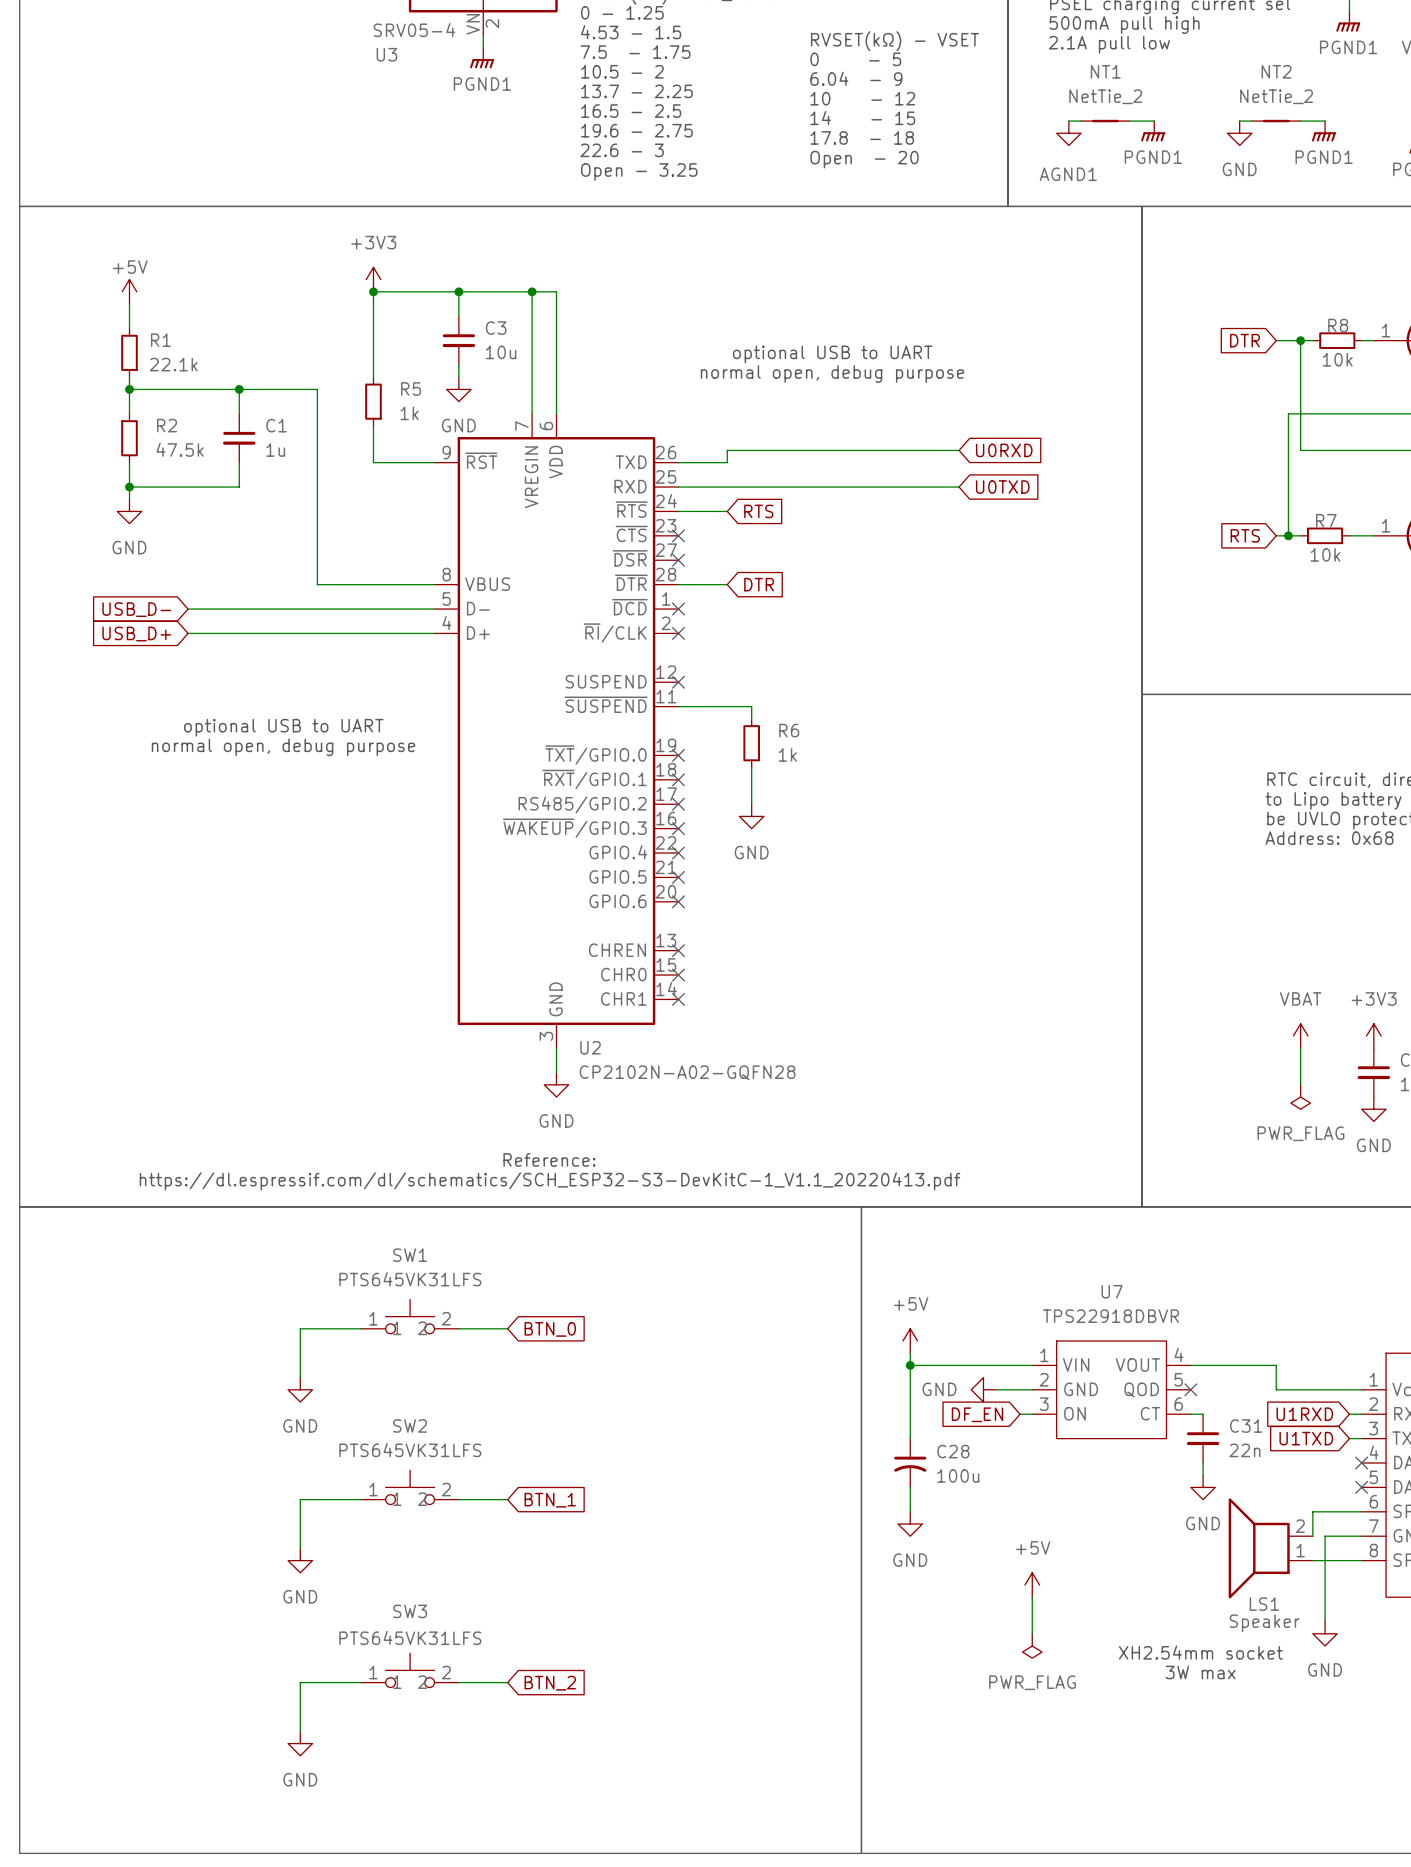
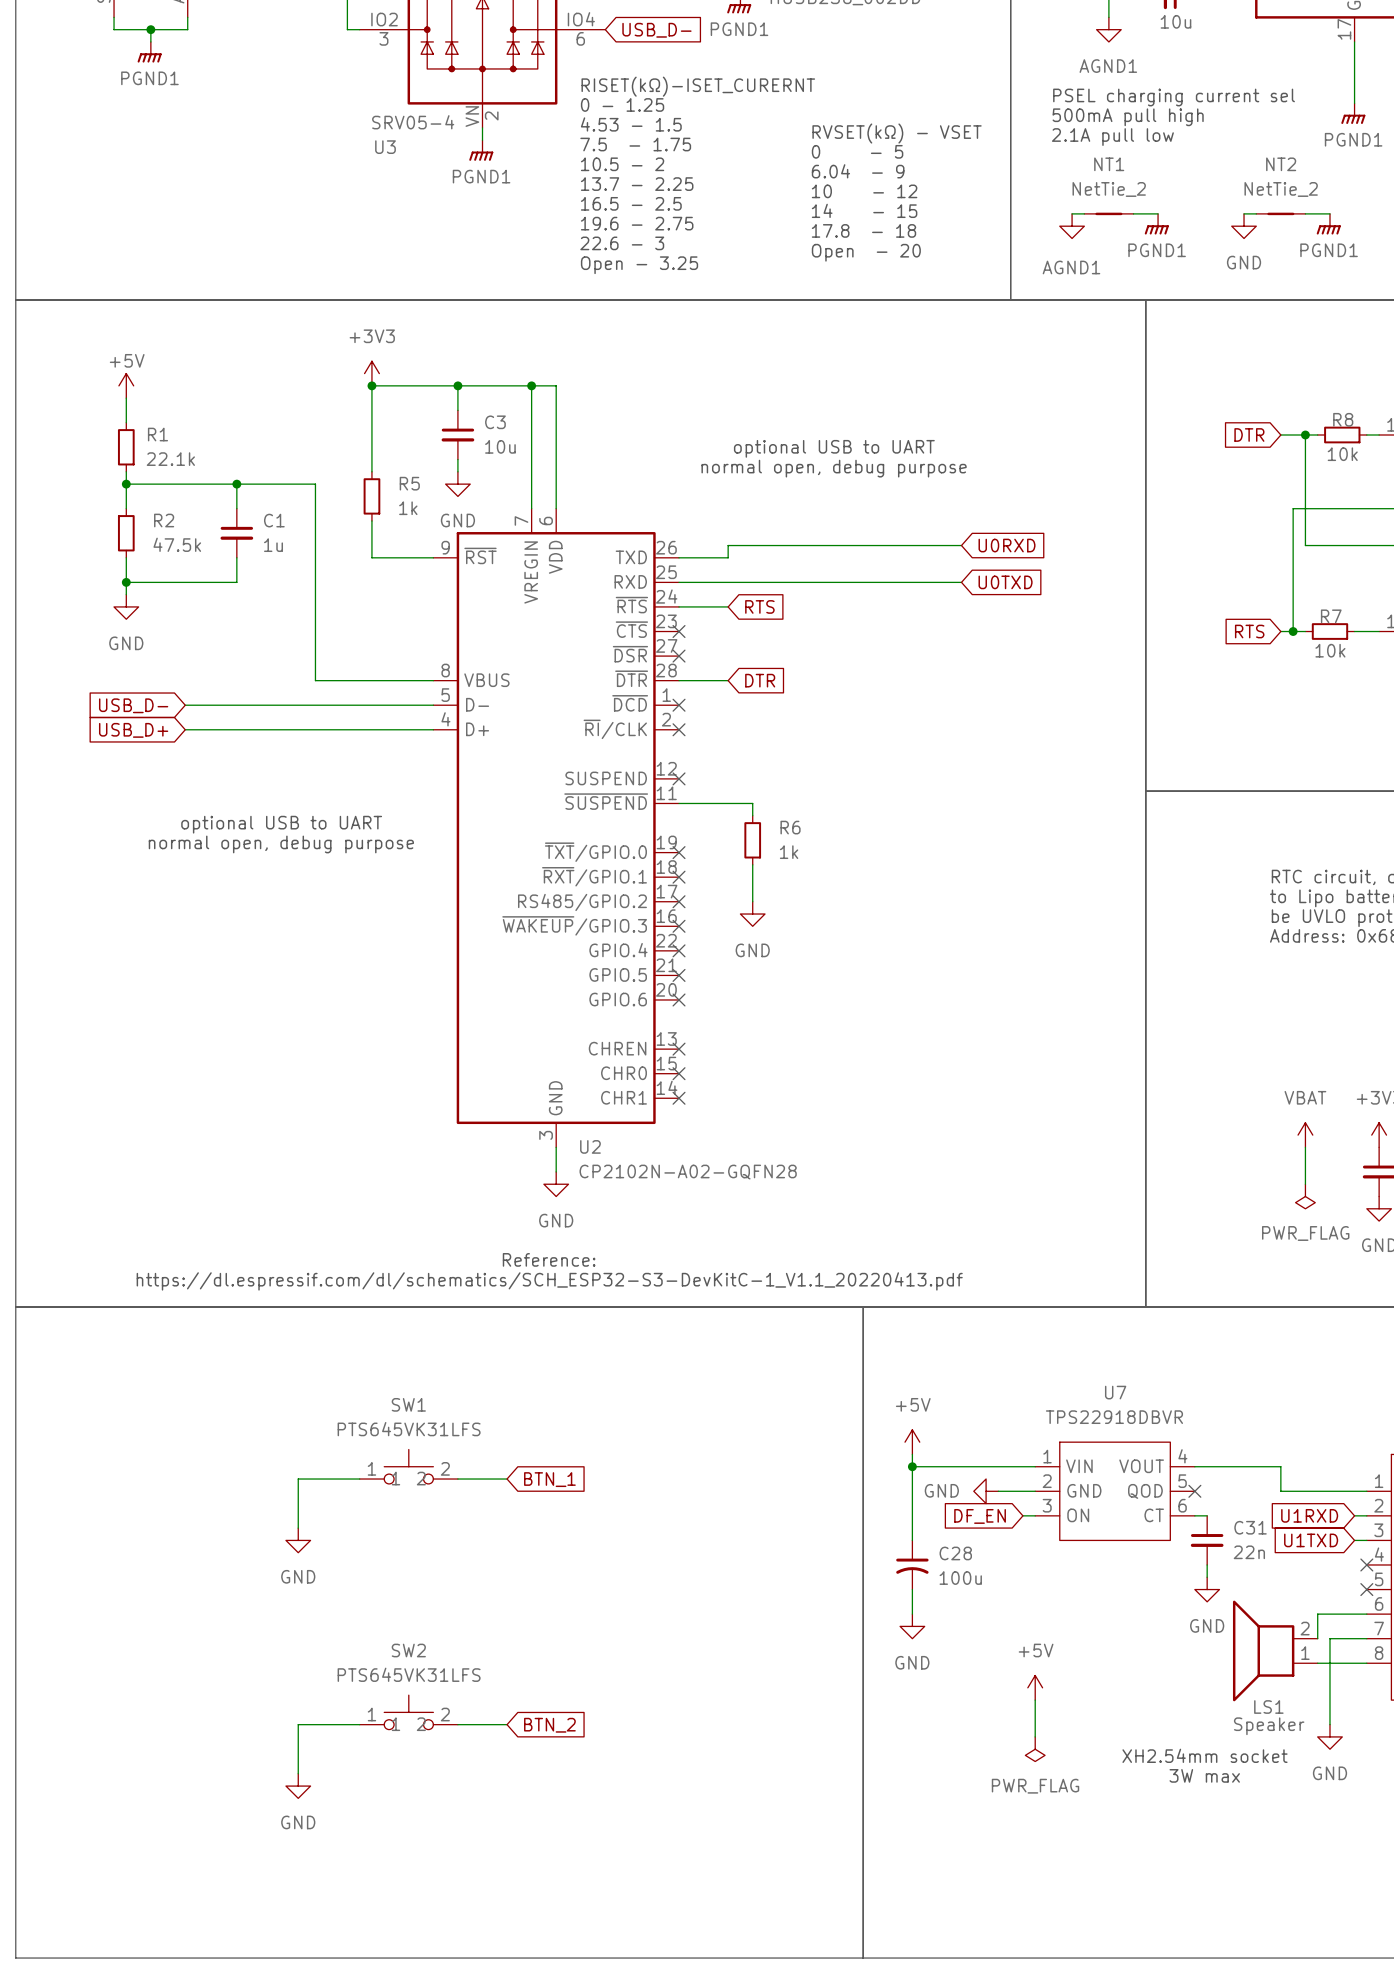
SW1 position: (410, 1316) -> (408, 1466)
wire: (361, 1328) (300, 1328) (300, 1377) -> (359, 1479) (298, 1479) (298, 1528)
wire: (458, 1328) (507, 1328) -> (457, 1479) (507, 1479)
global label: BTN_0 (550, 1329) -> none
power symbol position: GND (300, 1389) -> GND (298, 1540)
SW2 position: (410, 1487) -> (408, 1712)
wire: (361, 1499) (300, 1499) (300, 1548) -> none
wire: (458, 1499) (507, 1499) -> none
global label position: BTN_1 (550, 1500) -> BTN_1 (549, 1479)
power symbol: GND (300, 1560) -> none
SW3: PTS645VK31LFS (410, 1670) -> none
power symbol: none -> GND (298, 1786)
wire: (361, 1682) (300, 1682) (300, 1731) -> (359, 1724) (298, 1724) (298, 1773)
wire: (458, 1682) (507, 1682) -> (457, 1724) (507, 1724)
global label position: BTN_2 (550, 1683) -> BTN_2 (549, 1725)
power symbol: GND (300, 1743) -> none

